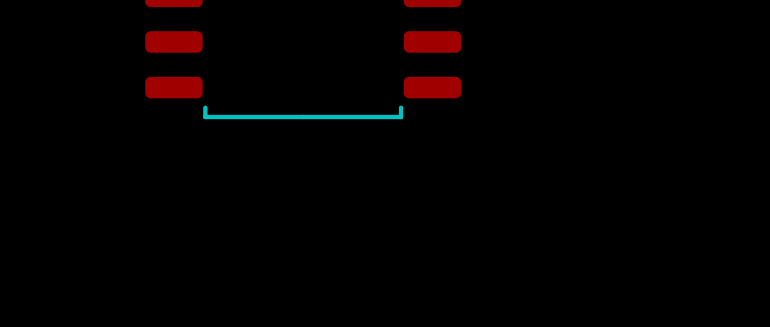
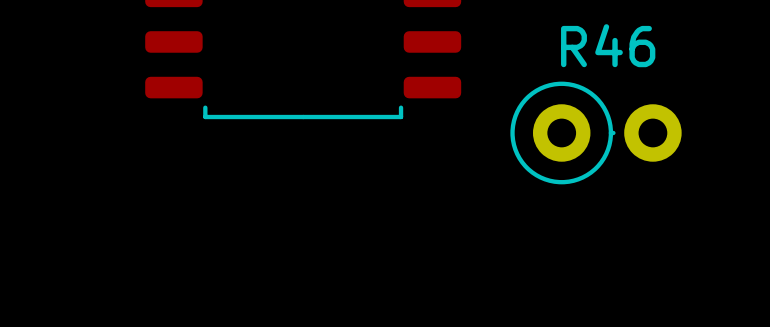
R46: none -> (596, 132)

